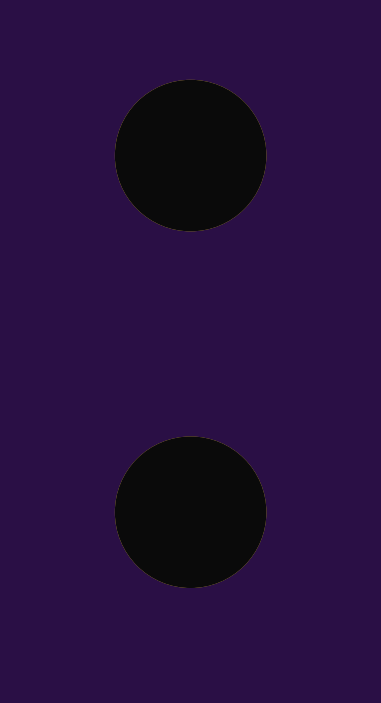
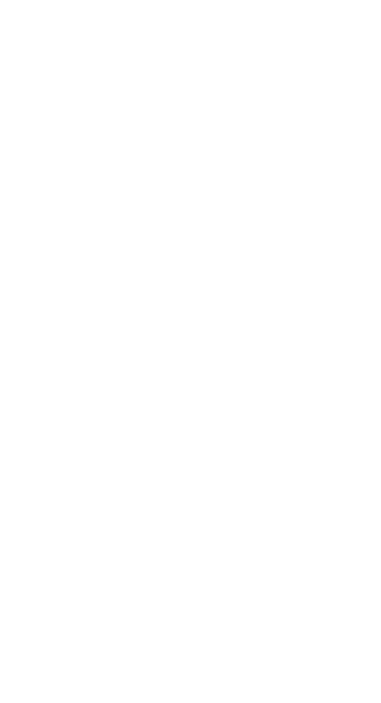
part: (190, 155) -> none
part: (190, 512) -> none

